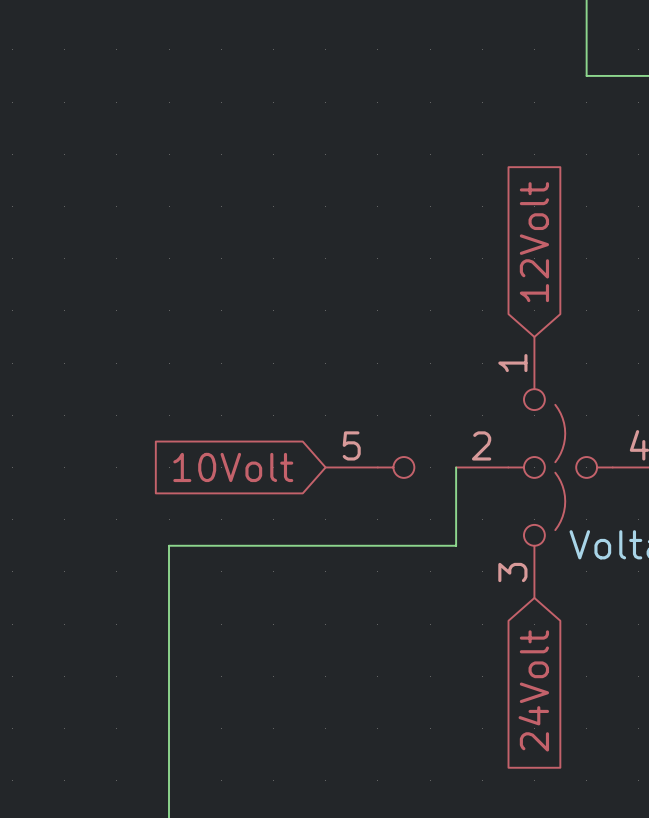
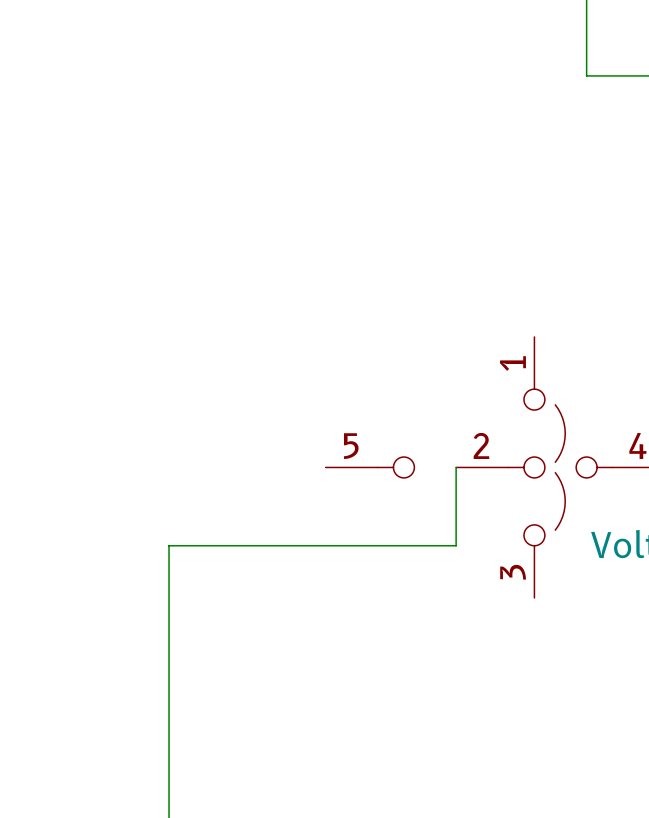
global label: 12Volt (534, 242) -> none
global label: 10Volt (233, 467) -> none
global label: 24Volt (533, 690) -> none

